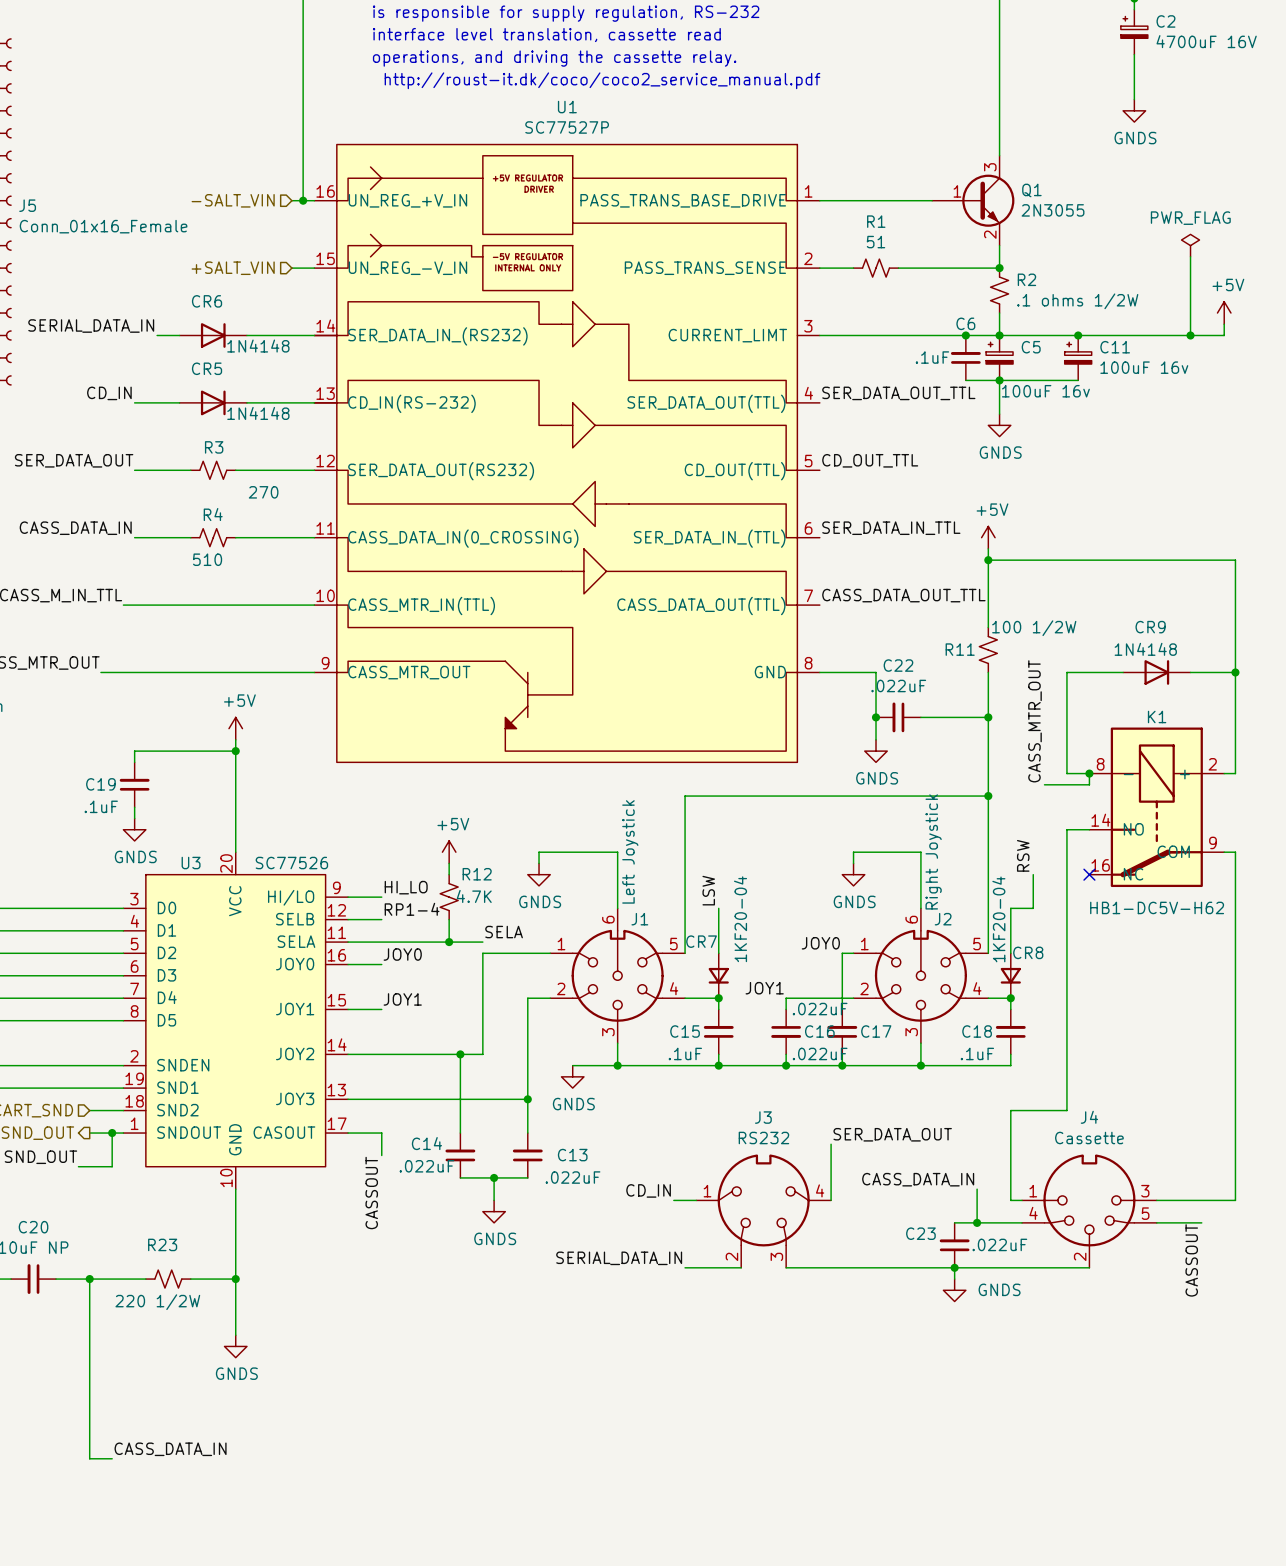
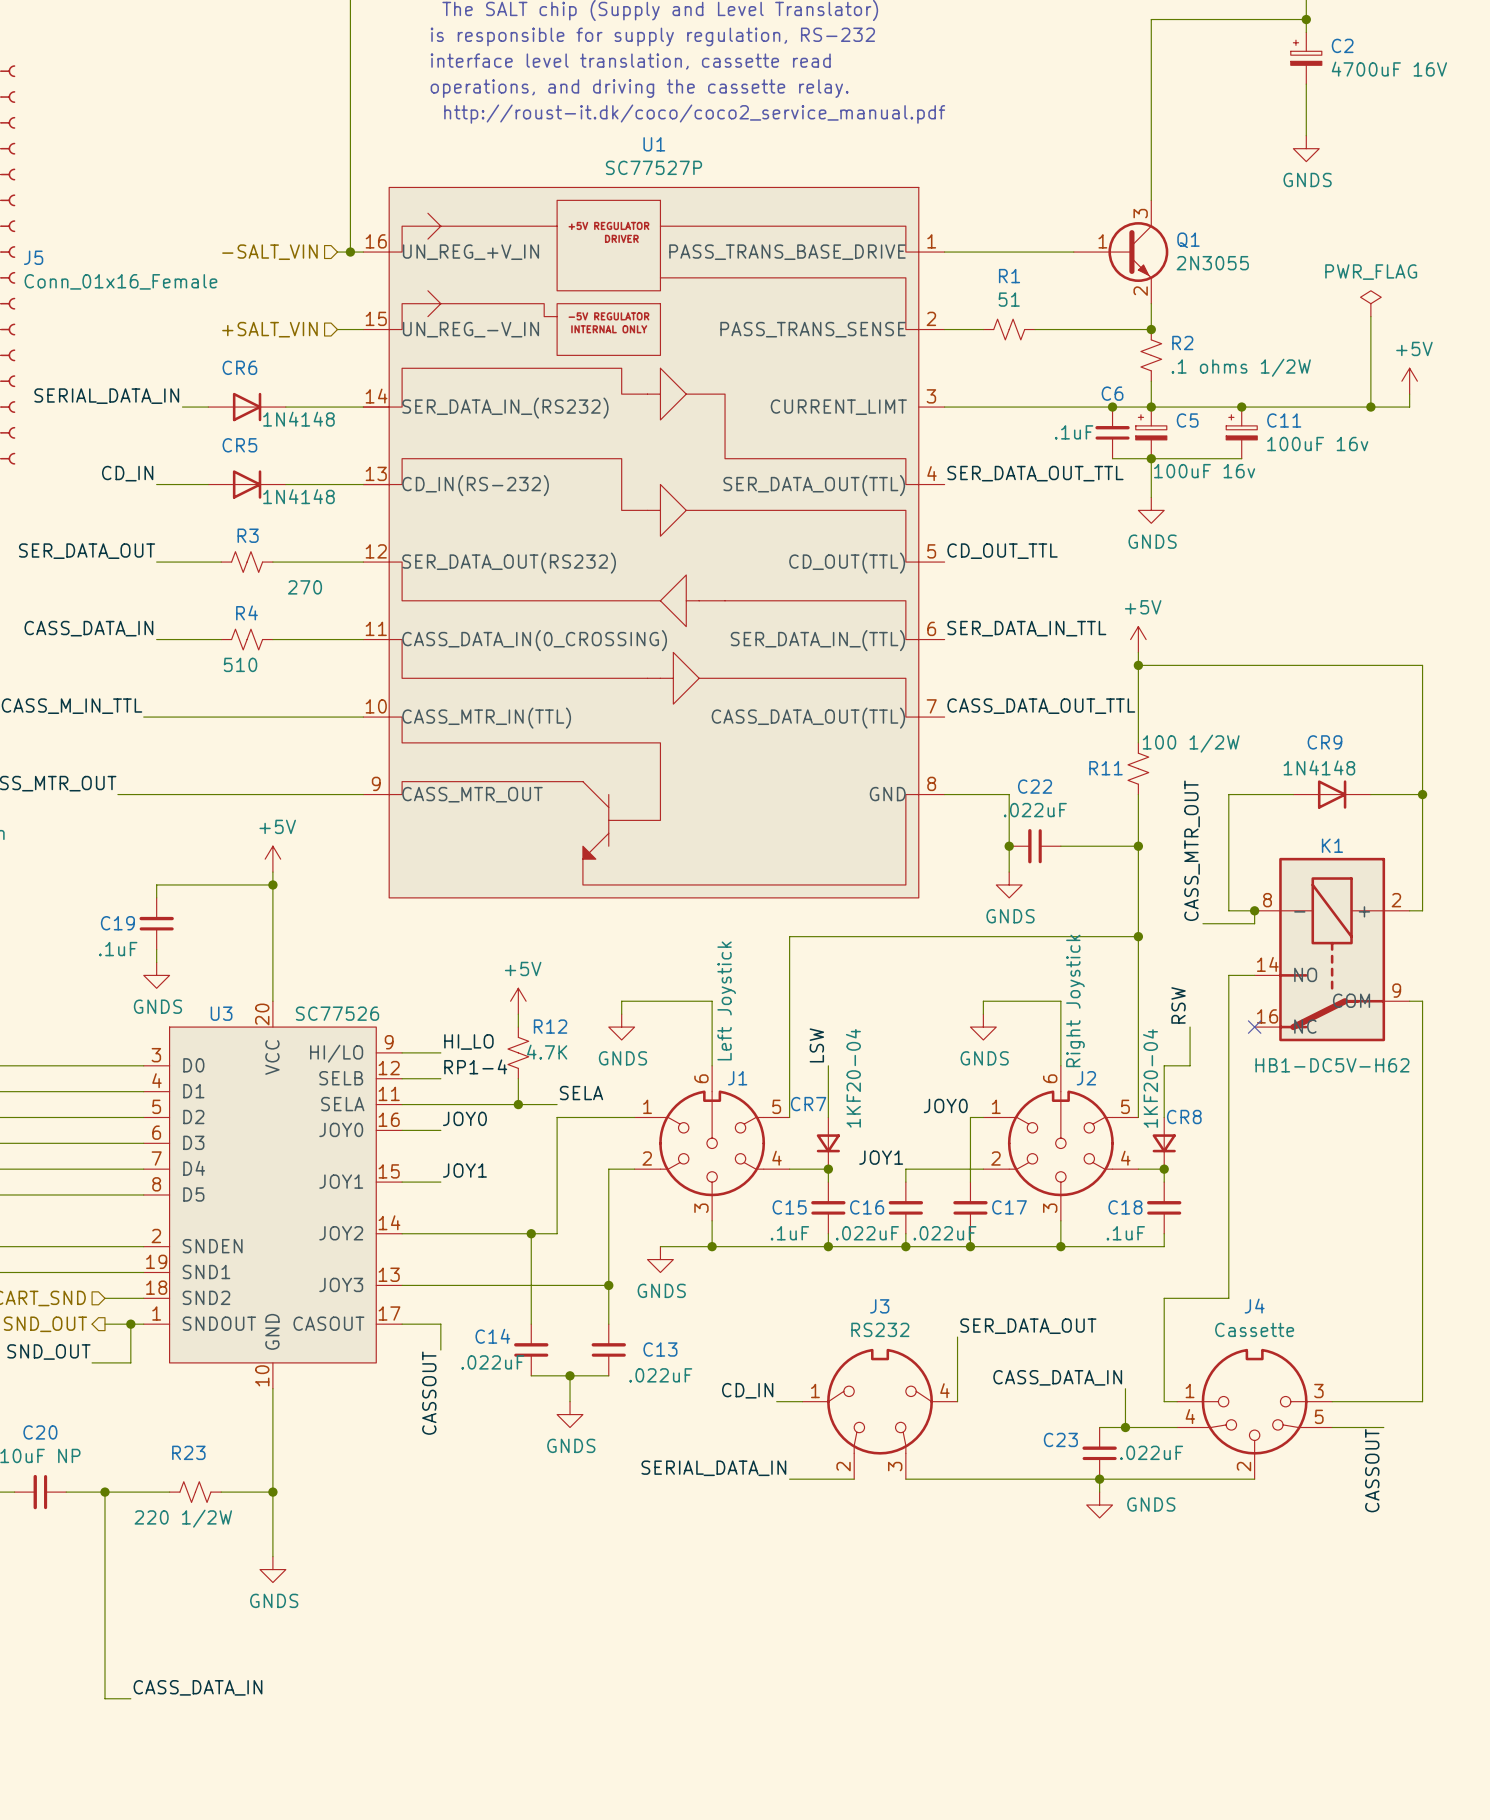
C16 rotation: 0° (786, 1031) -> 180° (905, 1207)

